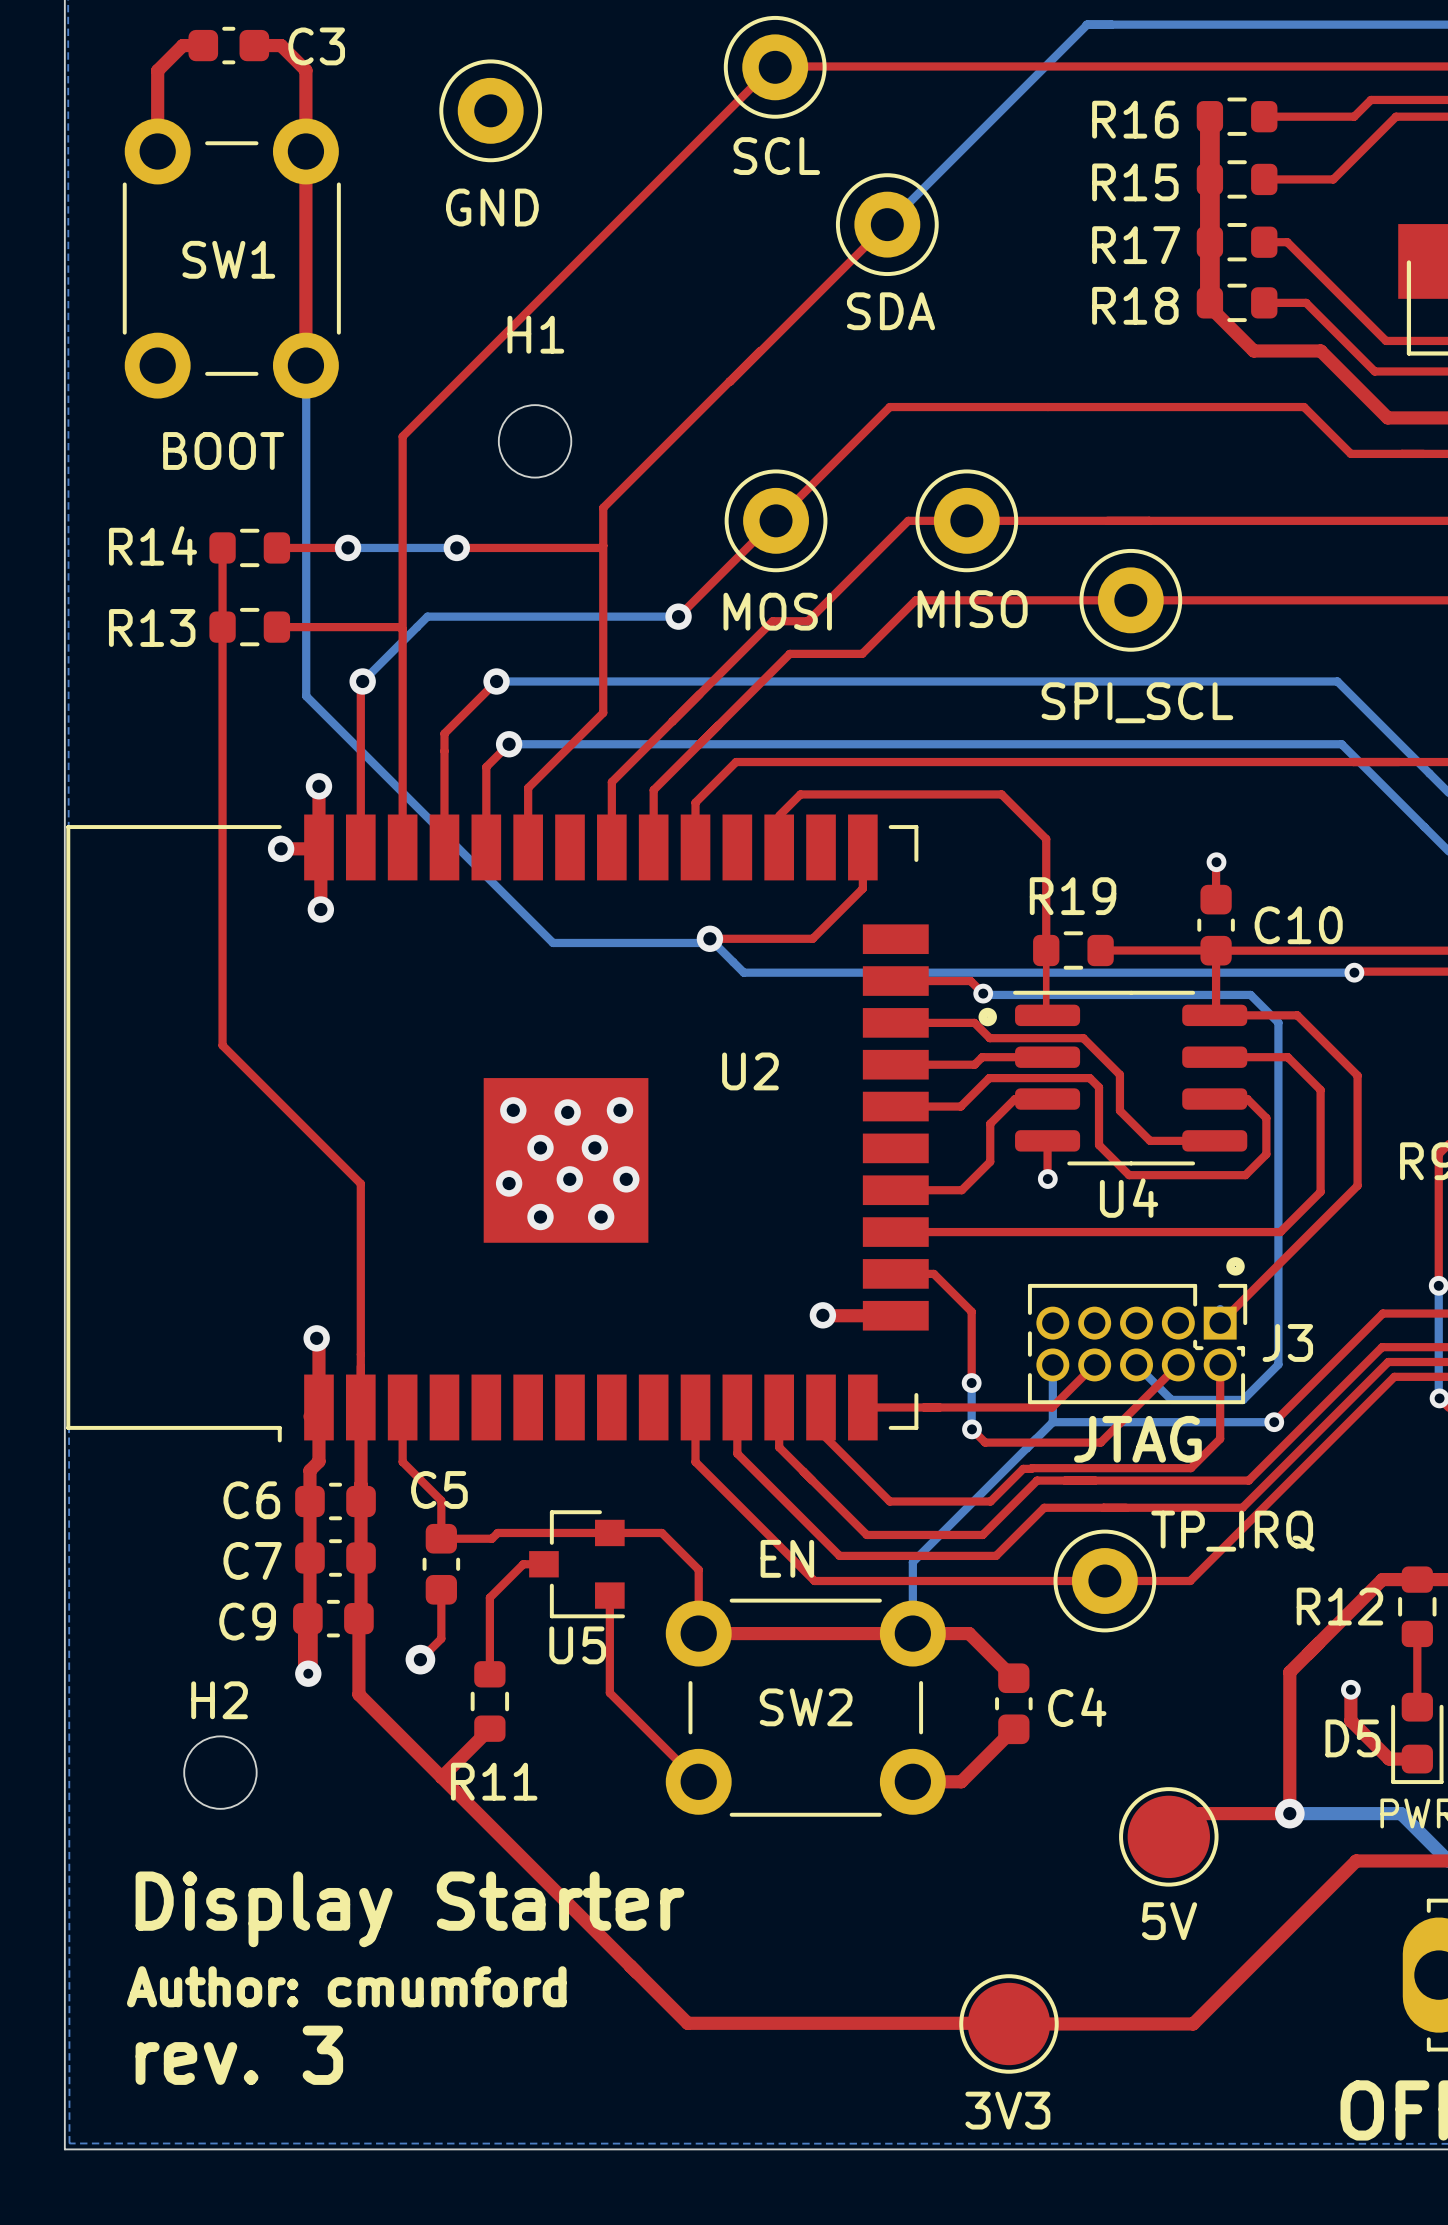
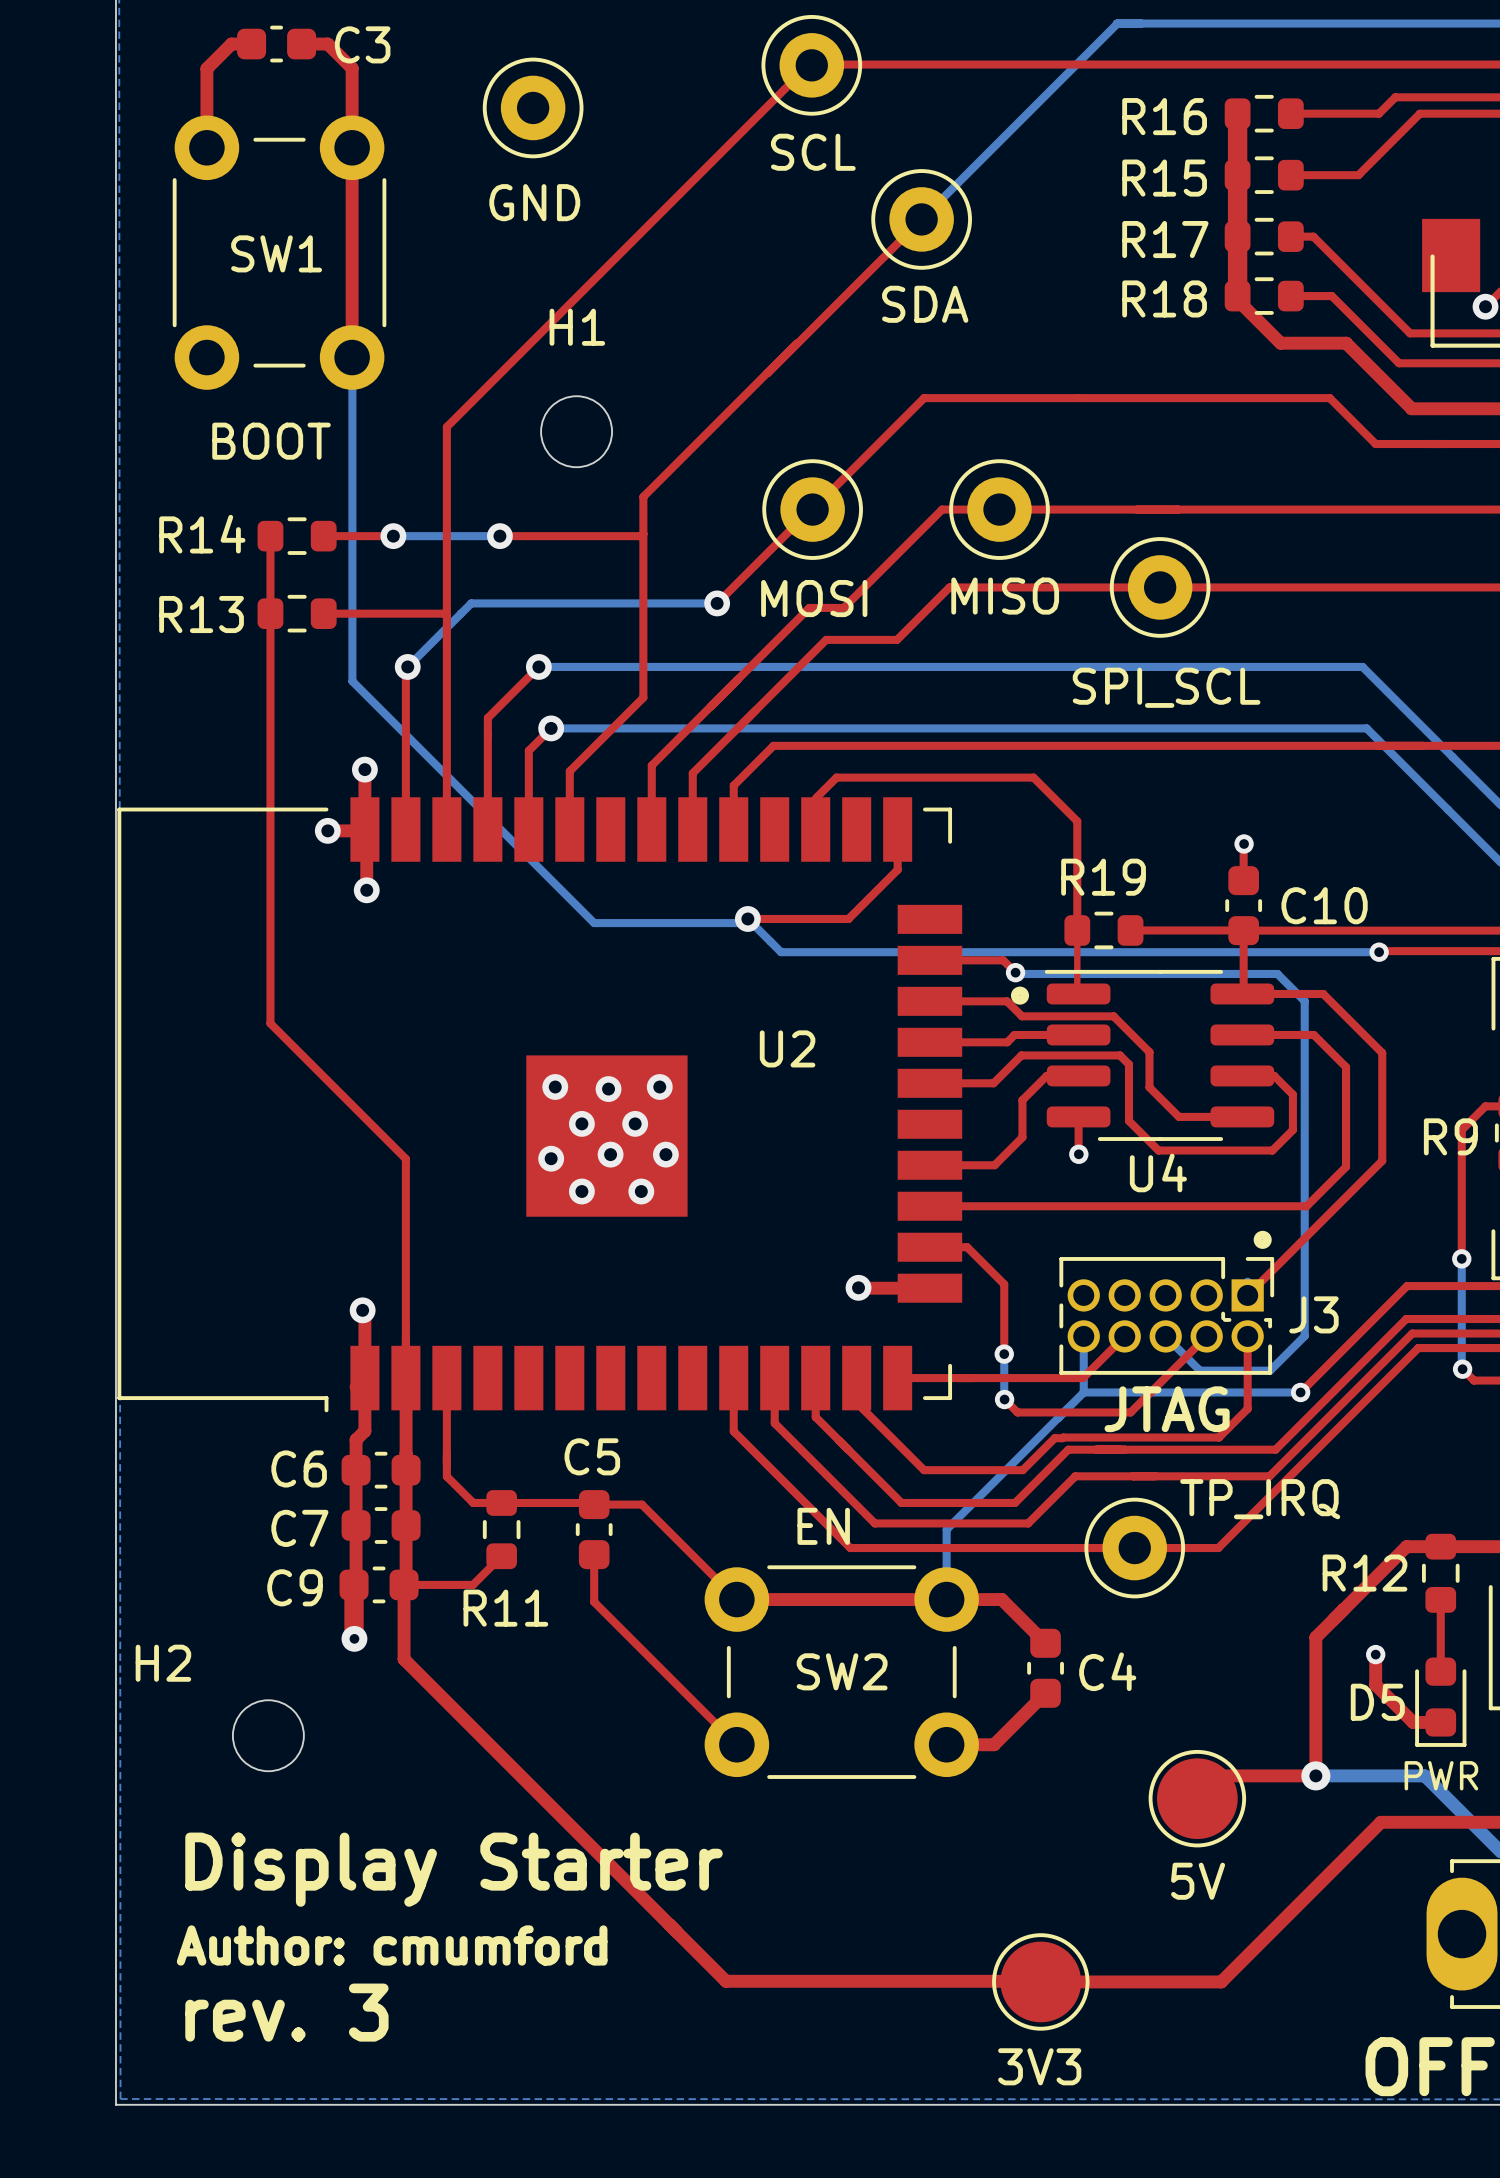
top track: (402, 1461) (441, 1500) (441, 1538) (491, 1538) (497, 1532) (661, 1532) (698, 1569) (698, 1633) -> (446, 1431) (446, 1476) (473, 1502) (641, 1504) (736, 1599)
C5 position: (441, 1564) -> (594, 1529)
top track: (543, 1564) (523, 1564) (489, 1597) (489, 1674) -> none
U5: (577, 1564) -> none
top track: (441, 1589) (441, 1638) (420, 1659) -> none
top track: none -> (501, 1556) (472, 1584) (407, 1584)
top track: (609, 1595) (609, 1692) -> (594, 1554) (594, 1602) (649, 1657)
via: (420, 1659) -> none
H2 name position: H2 (219, 1700) -> H2 (163, 1663)
R11 position: (489, 1701) -> (501, 1529)
top track: (489, 1729) (441, 1777) -> none

